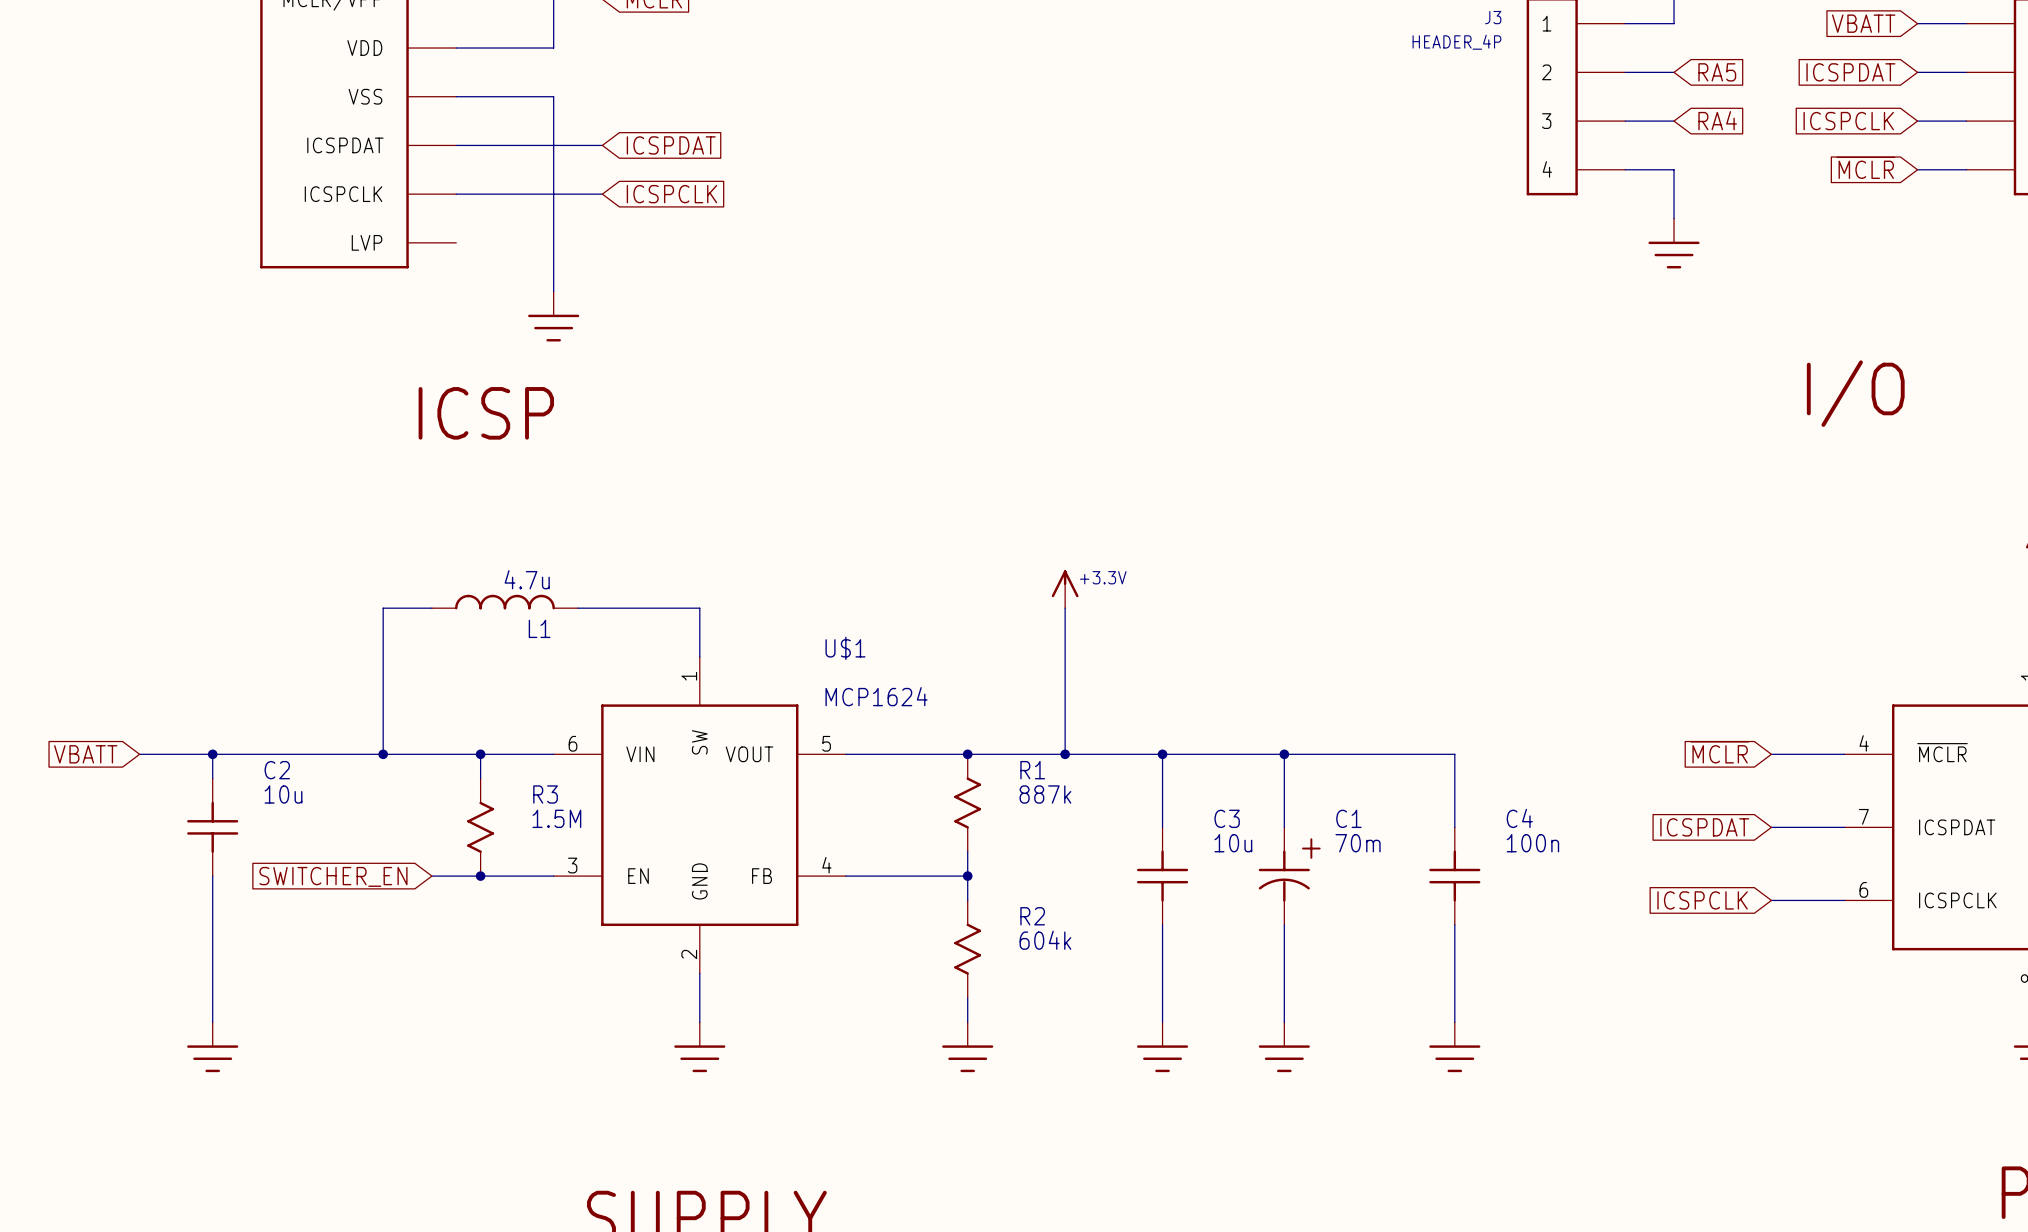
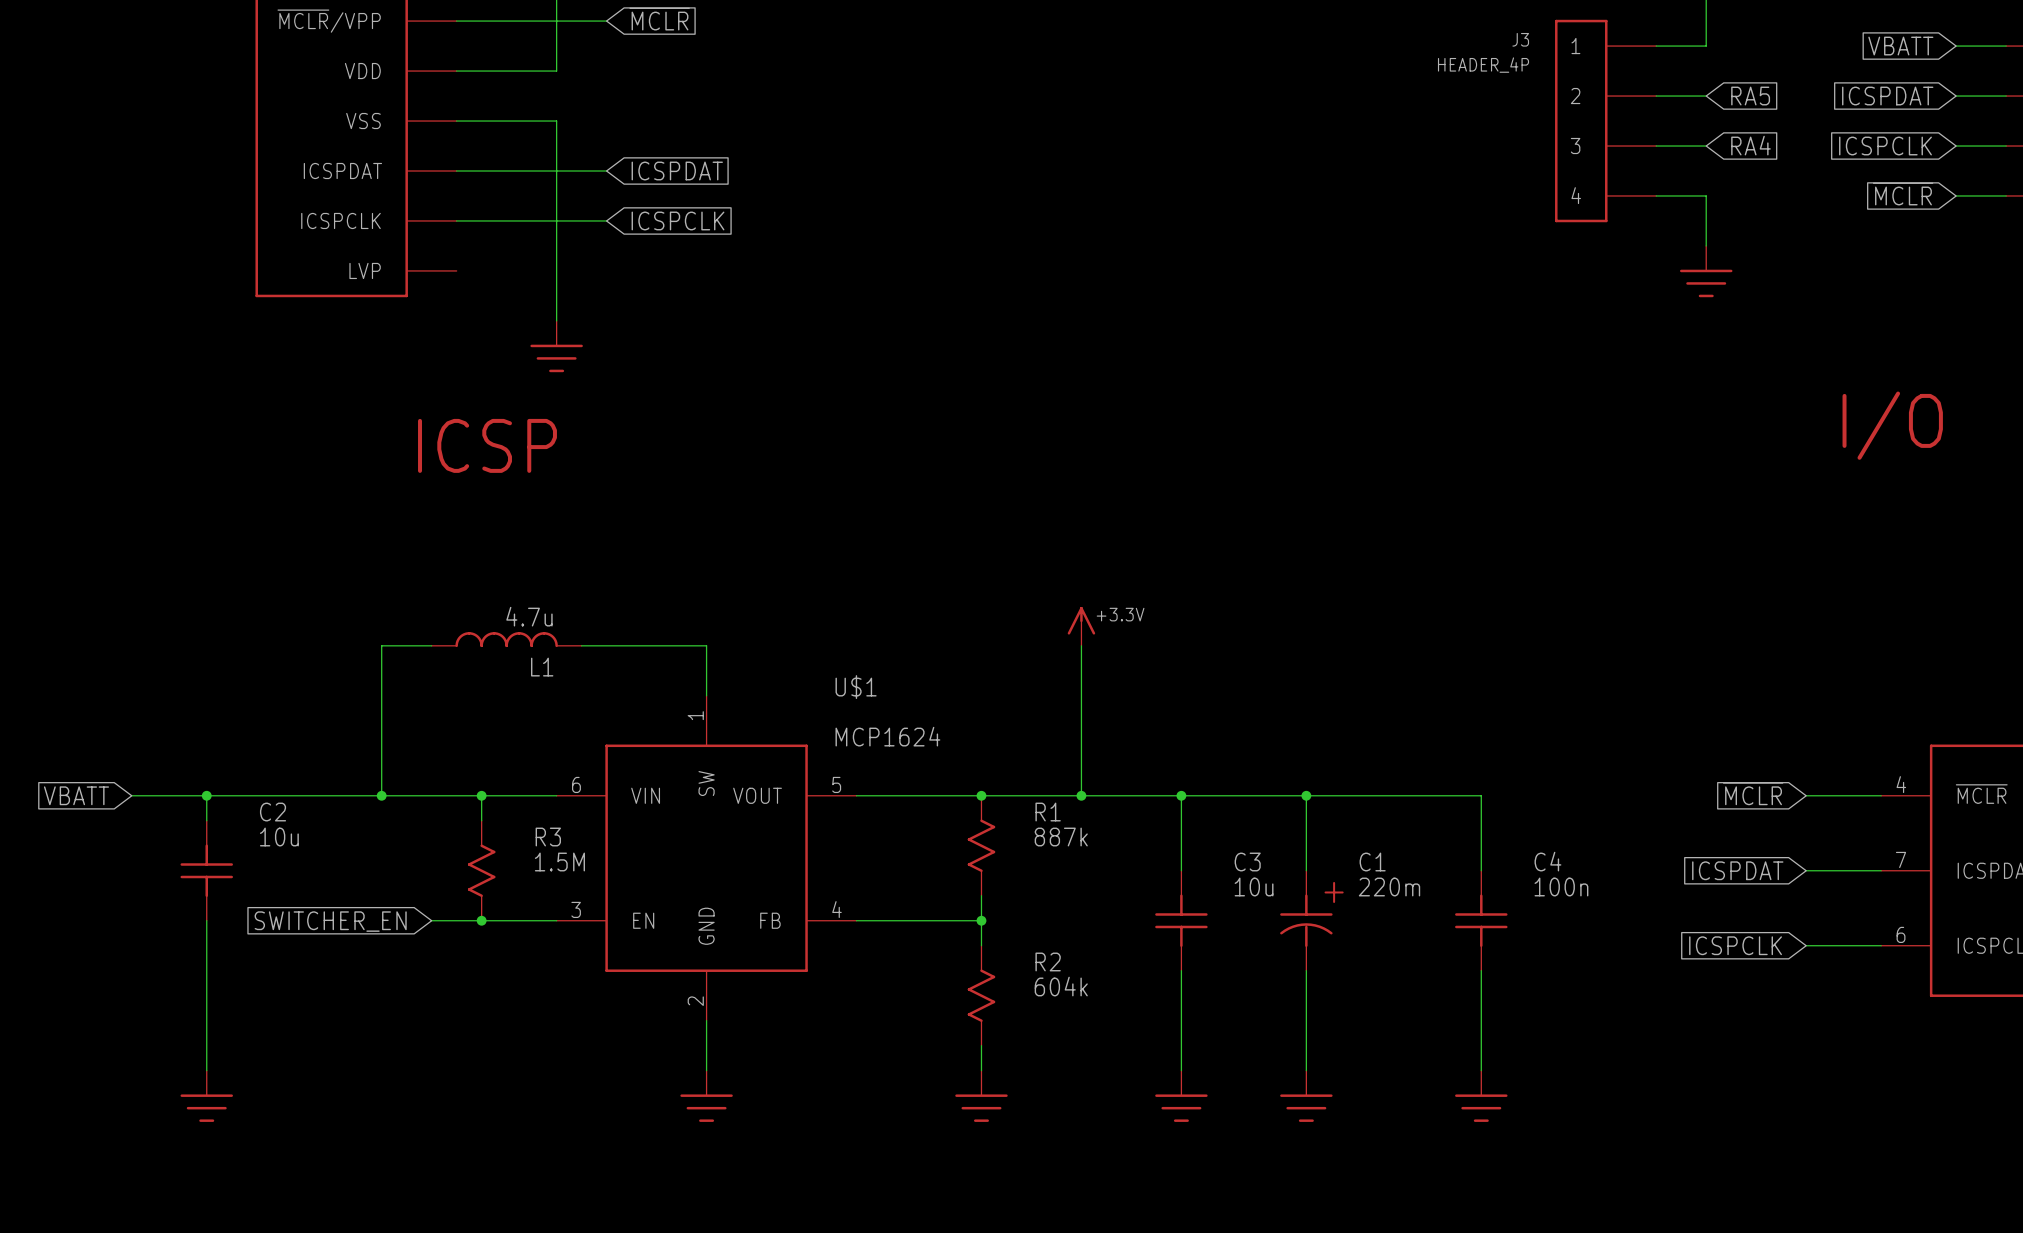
C1 value: 70m (1358, 843) -> 220m (1389, 887)

